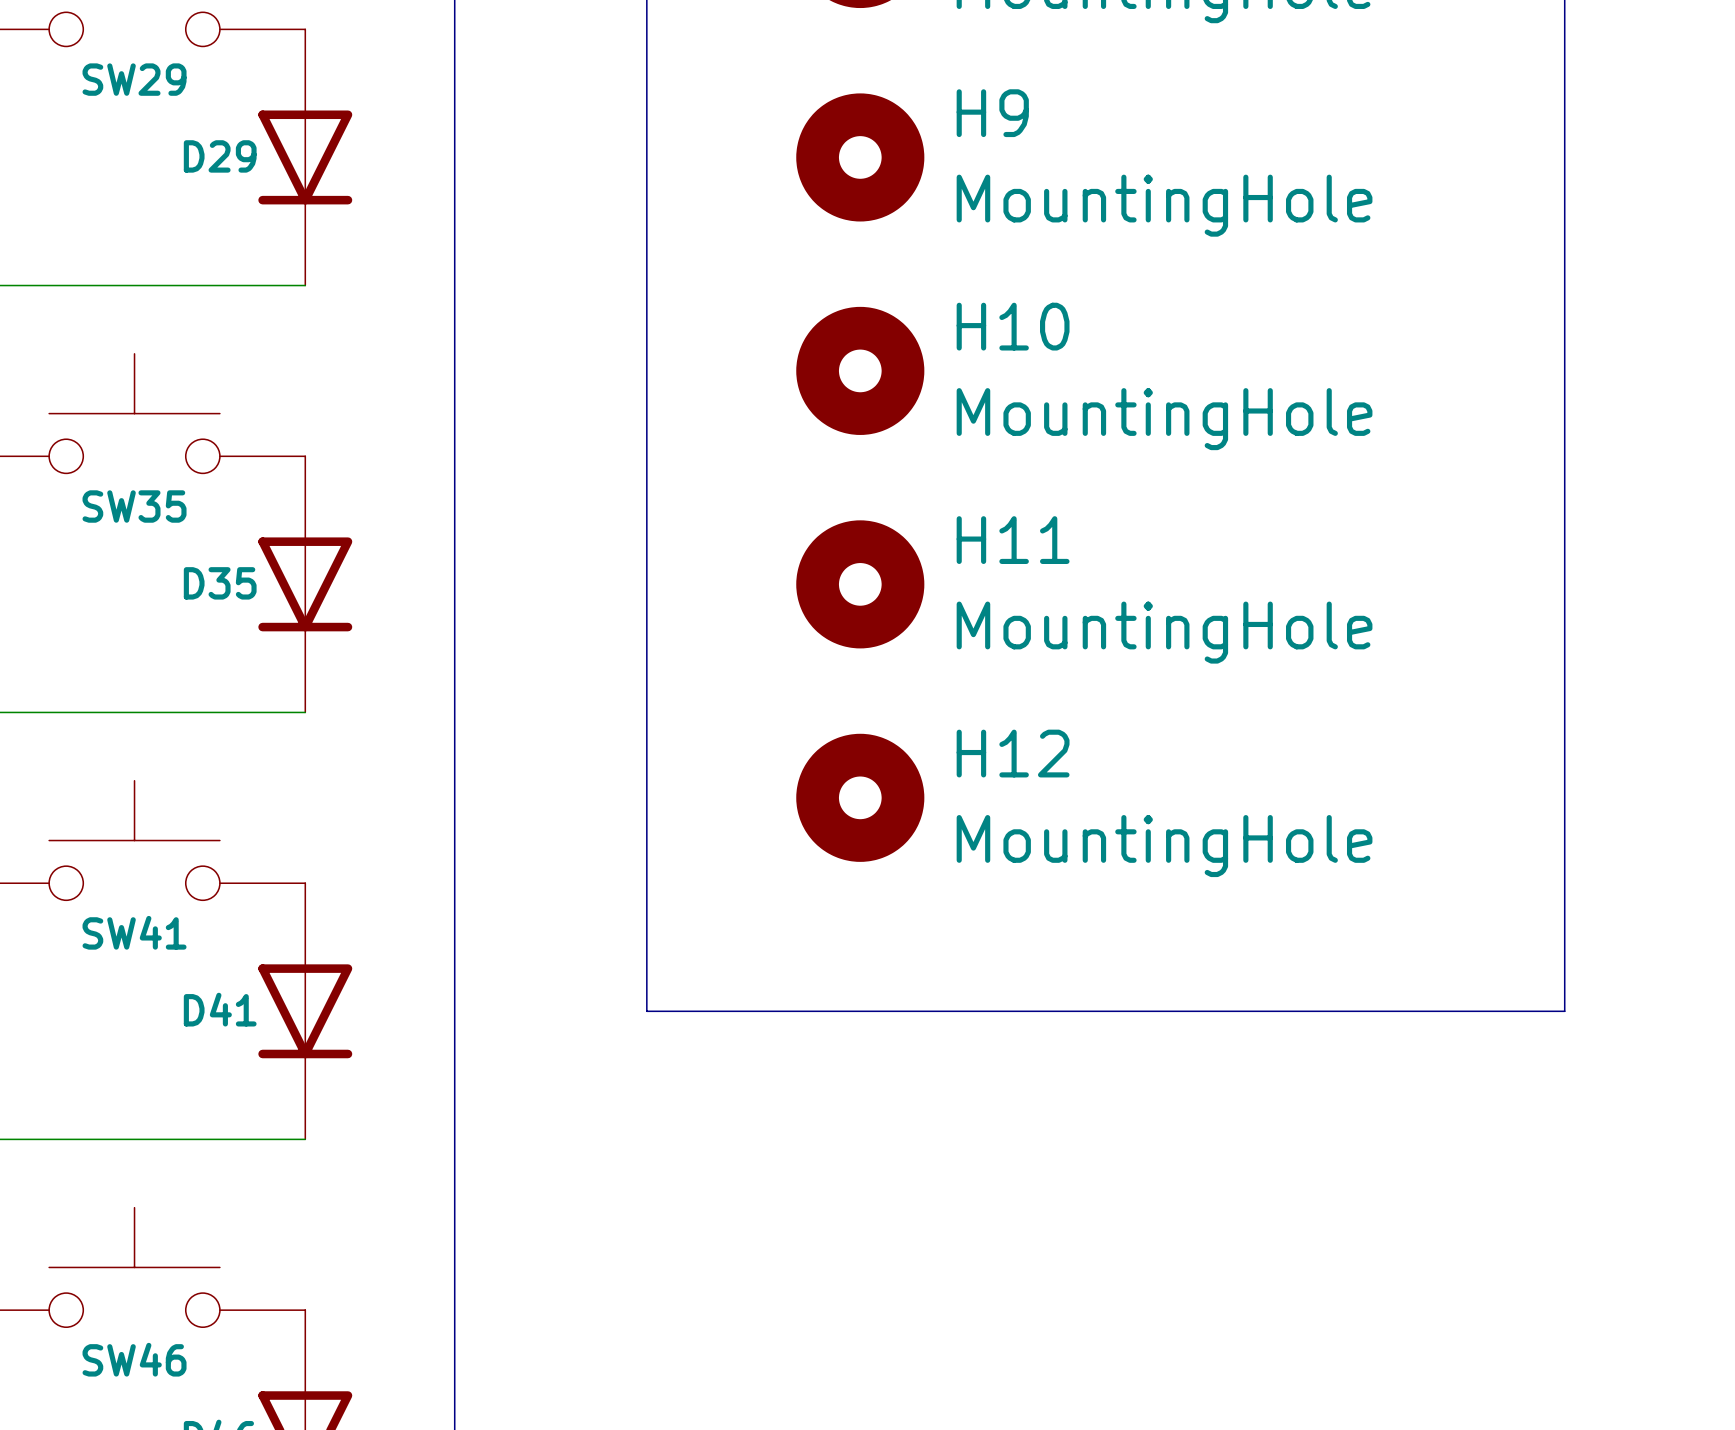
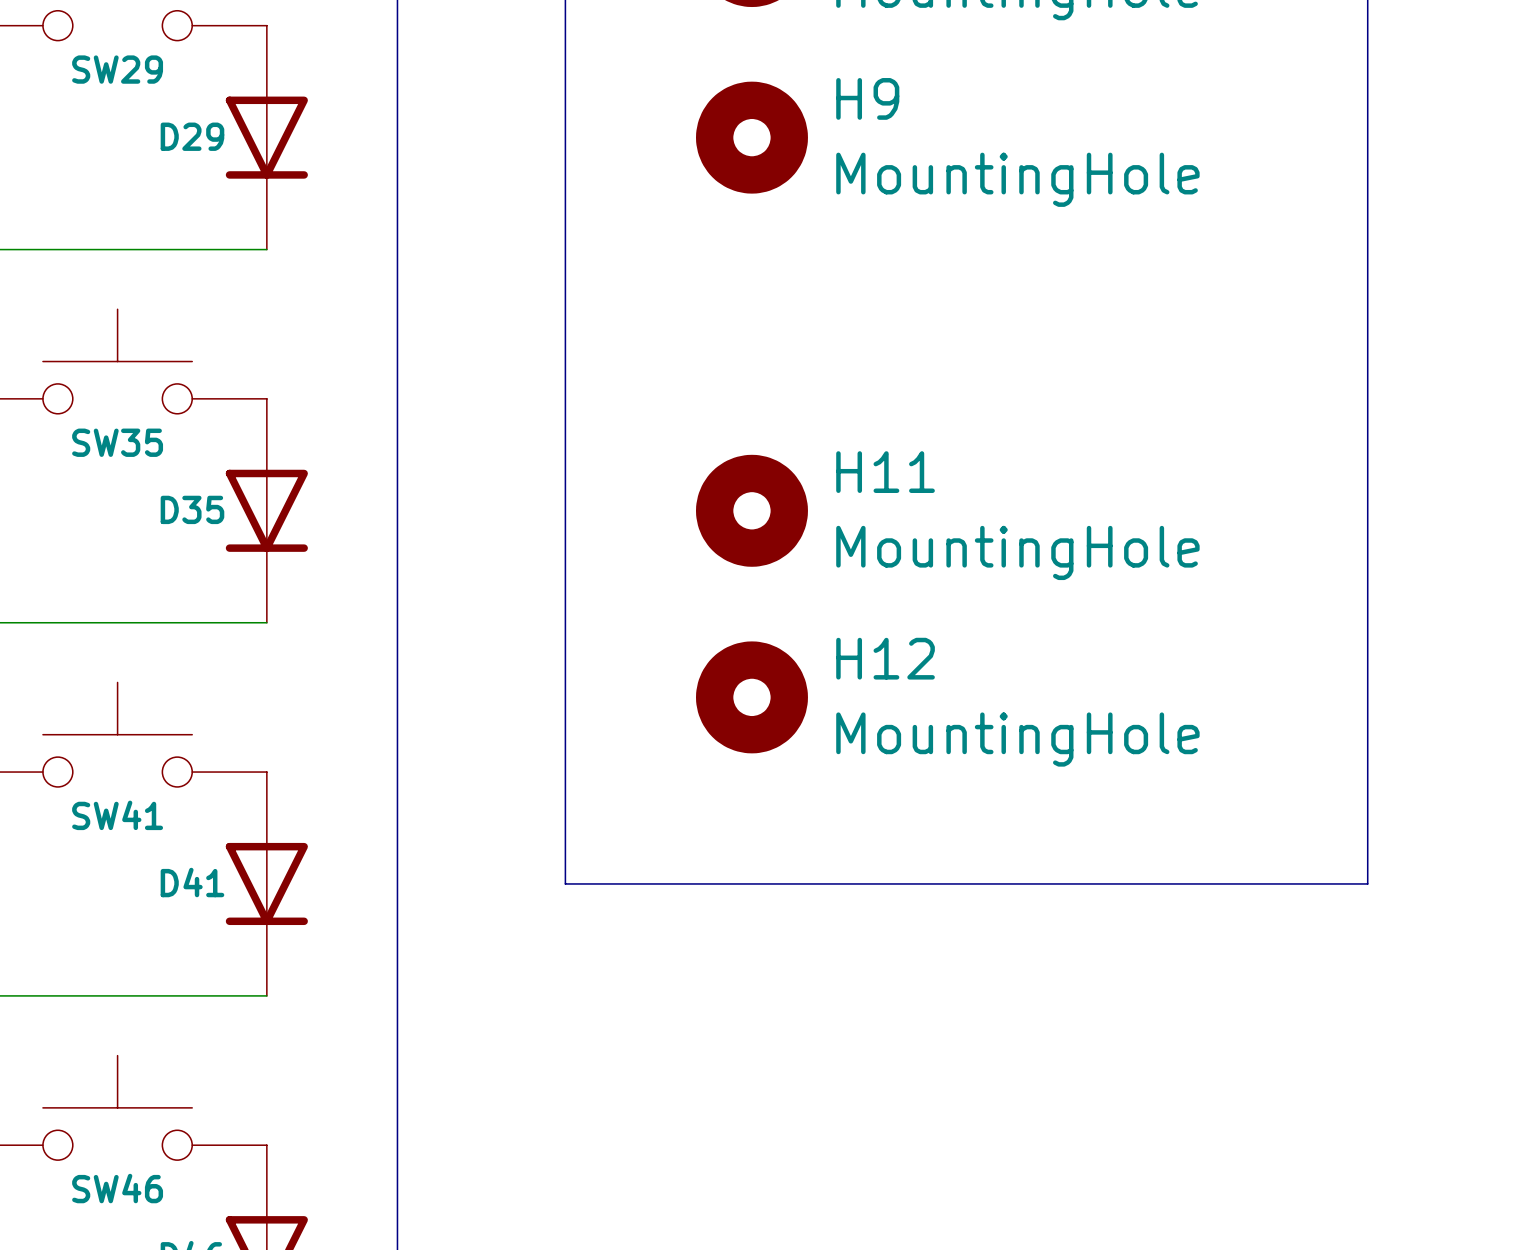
H10: MountingHole (860, 370) -> none

